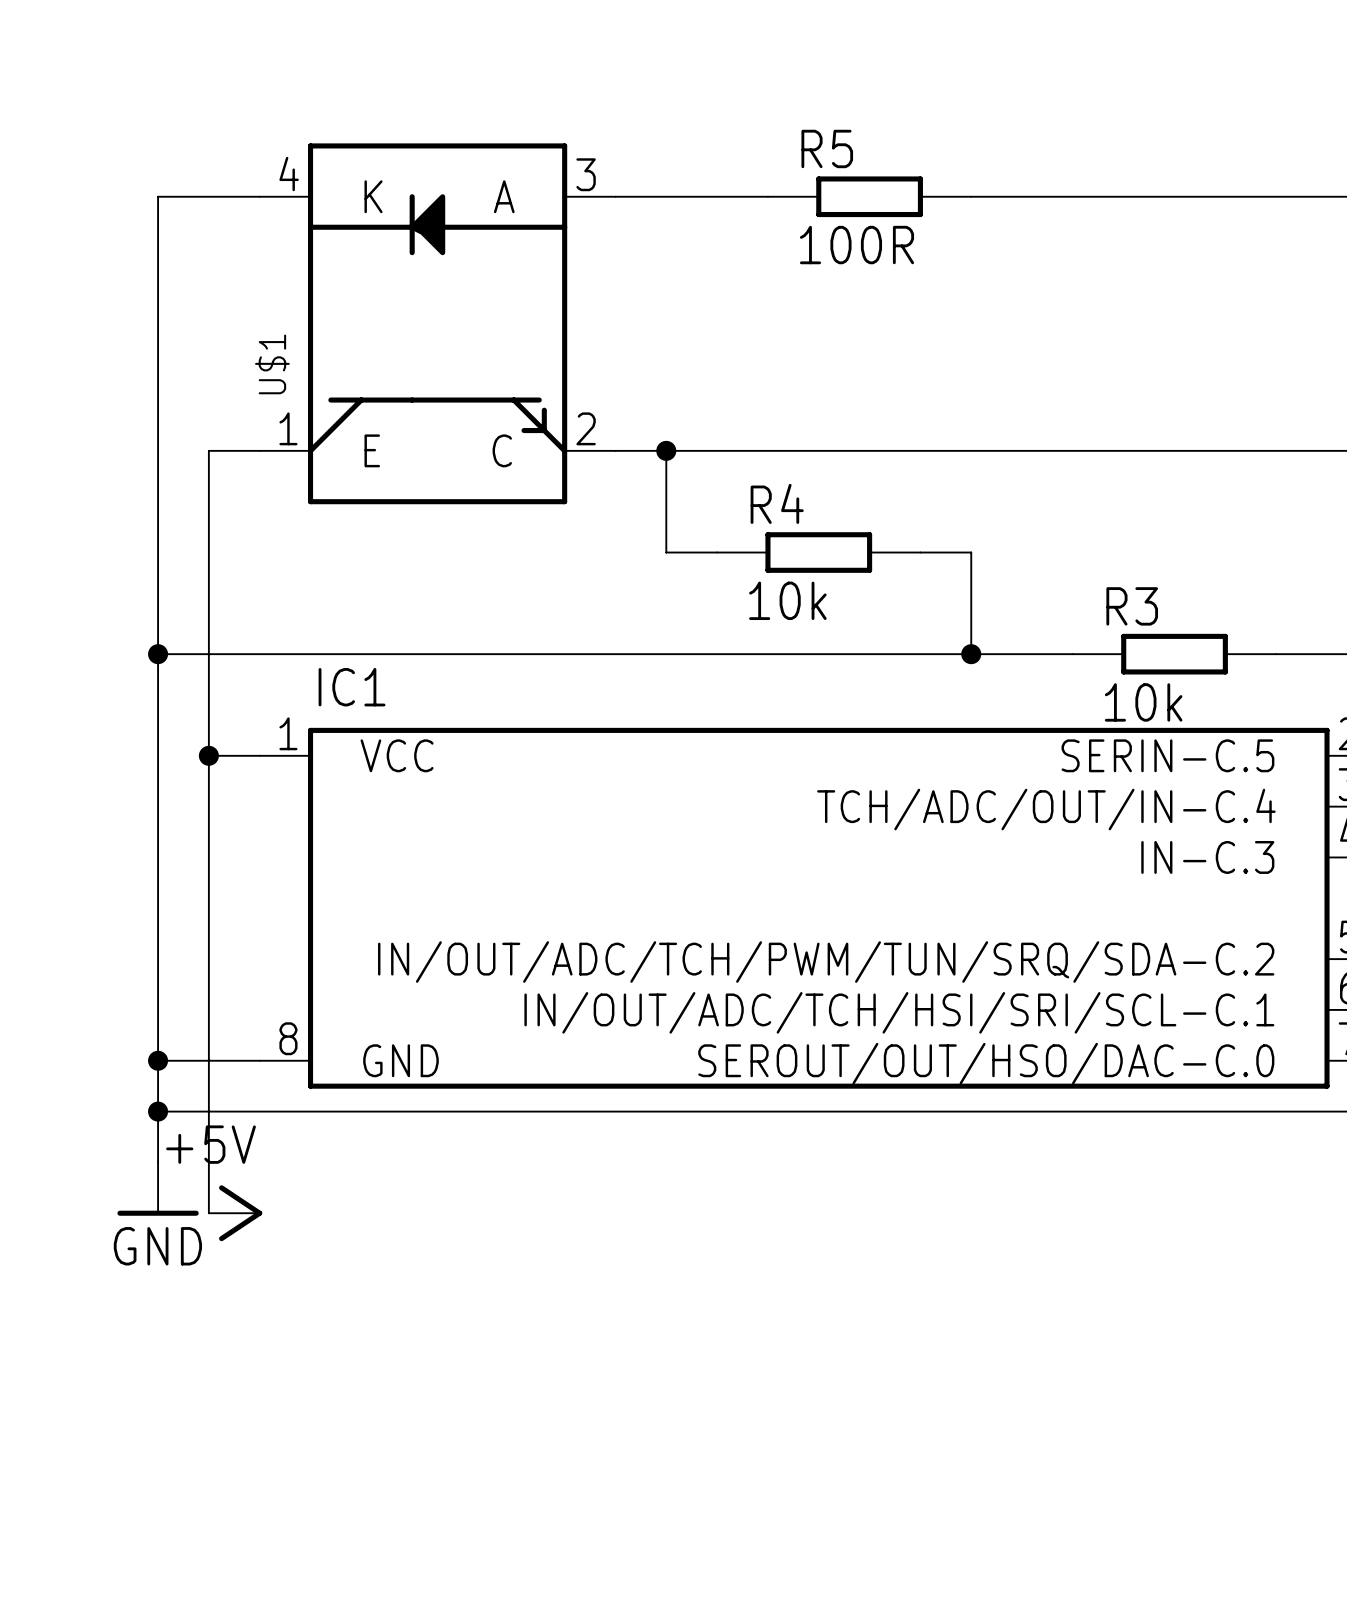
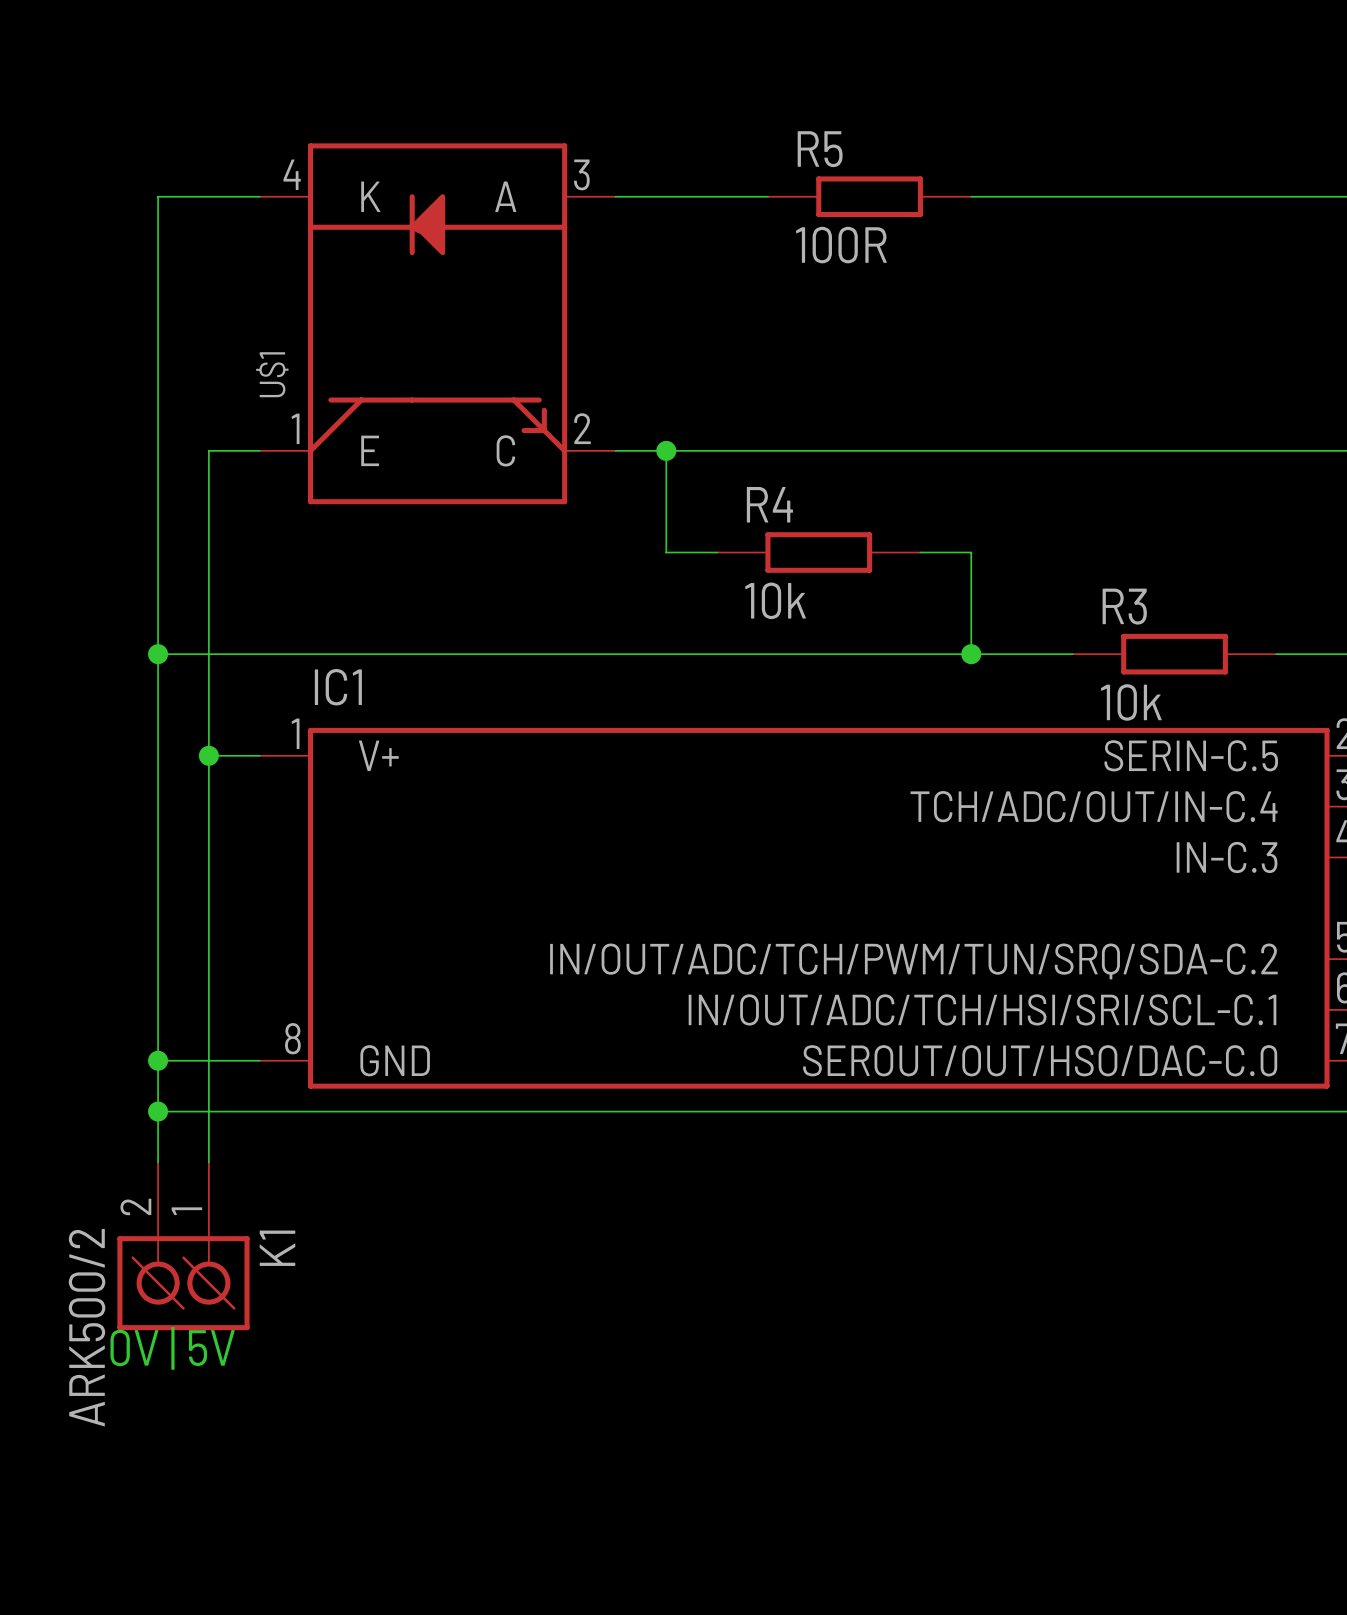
IC1 pin name: VCC (397, 755) -> V+ (378, 755)
power symbol: GND (158, 1189) -> none
power symbol: +5V (235, 1213) -> none
K1: none -> ARK500/2 (183, 1246)
text: none -> 0V | 5V (172, 1348)

